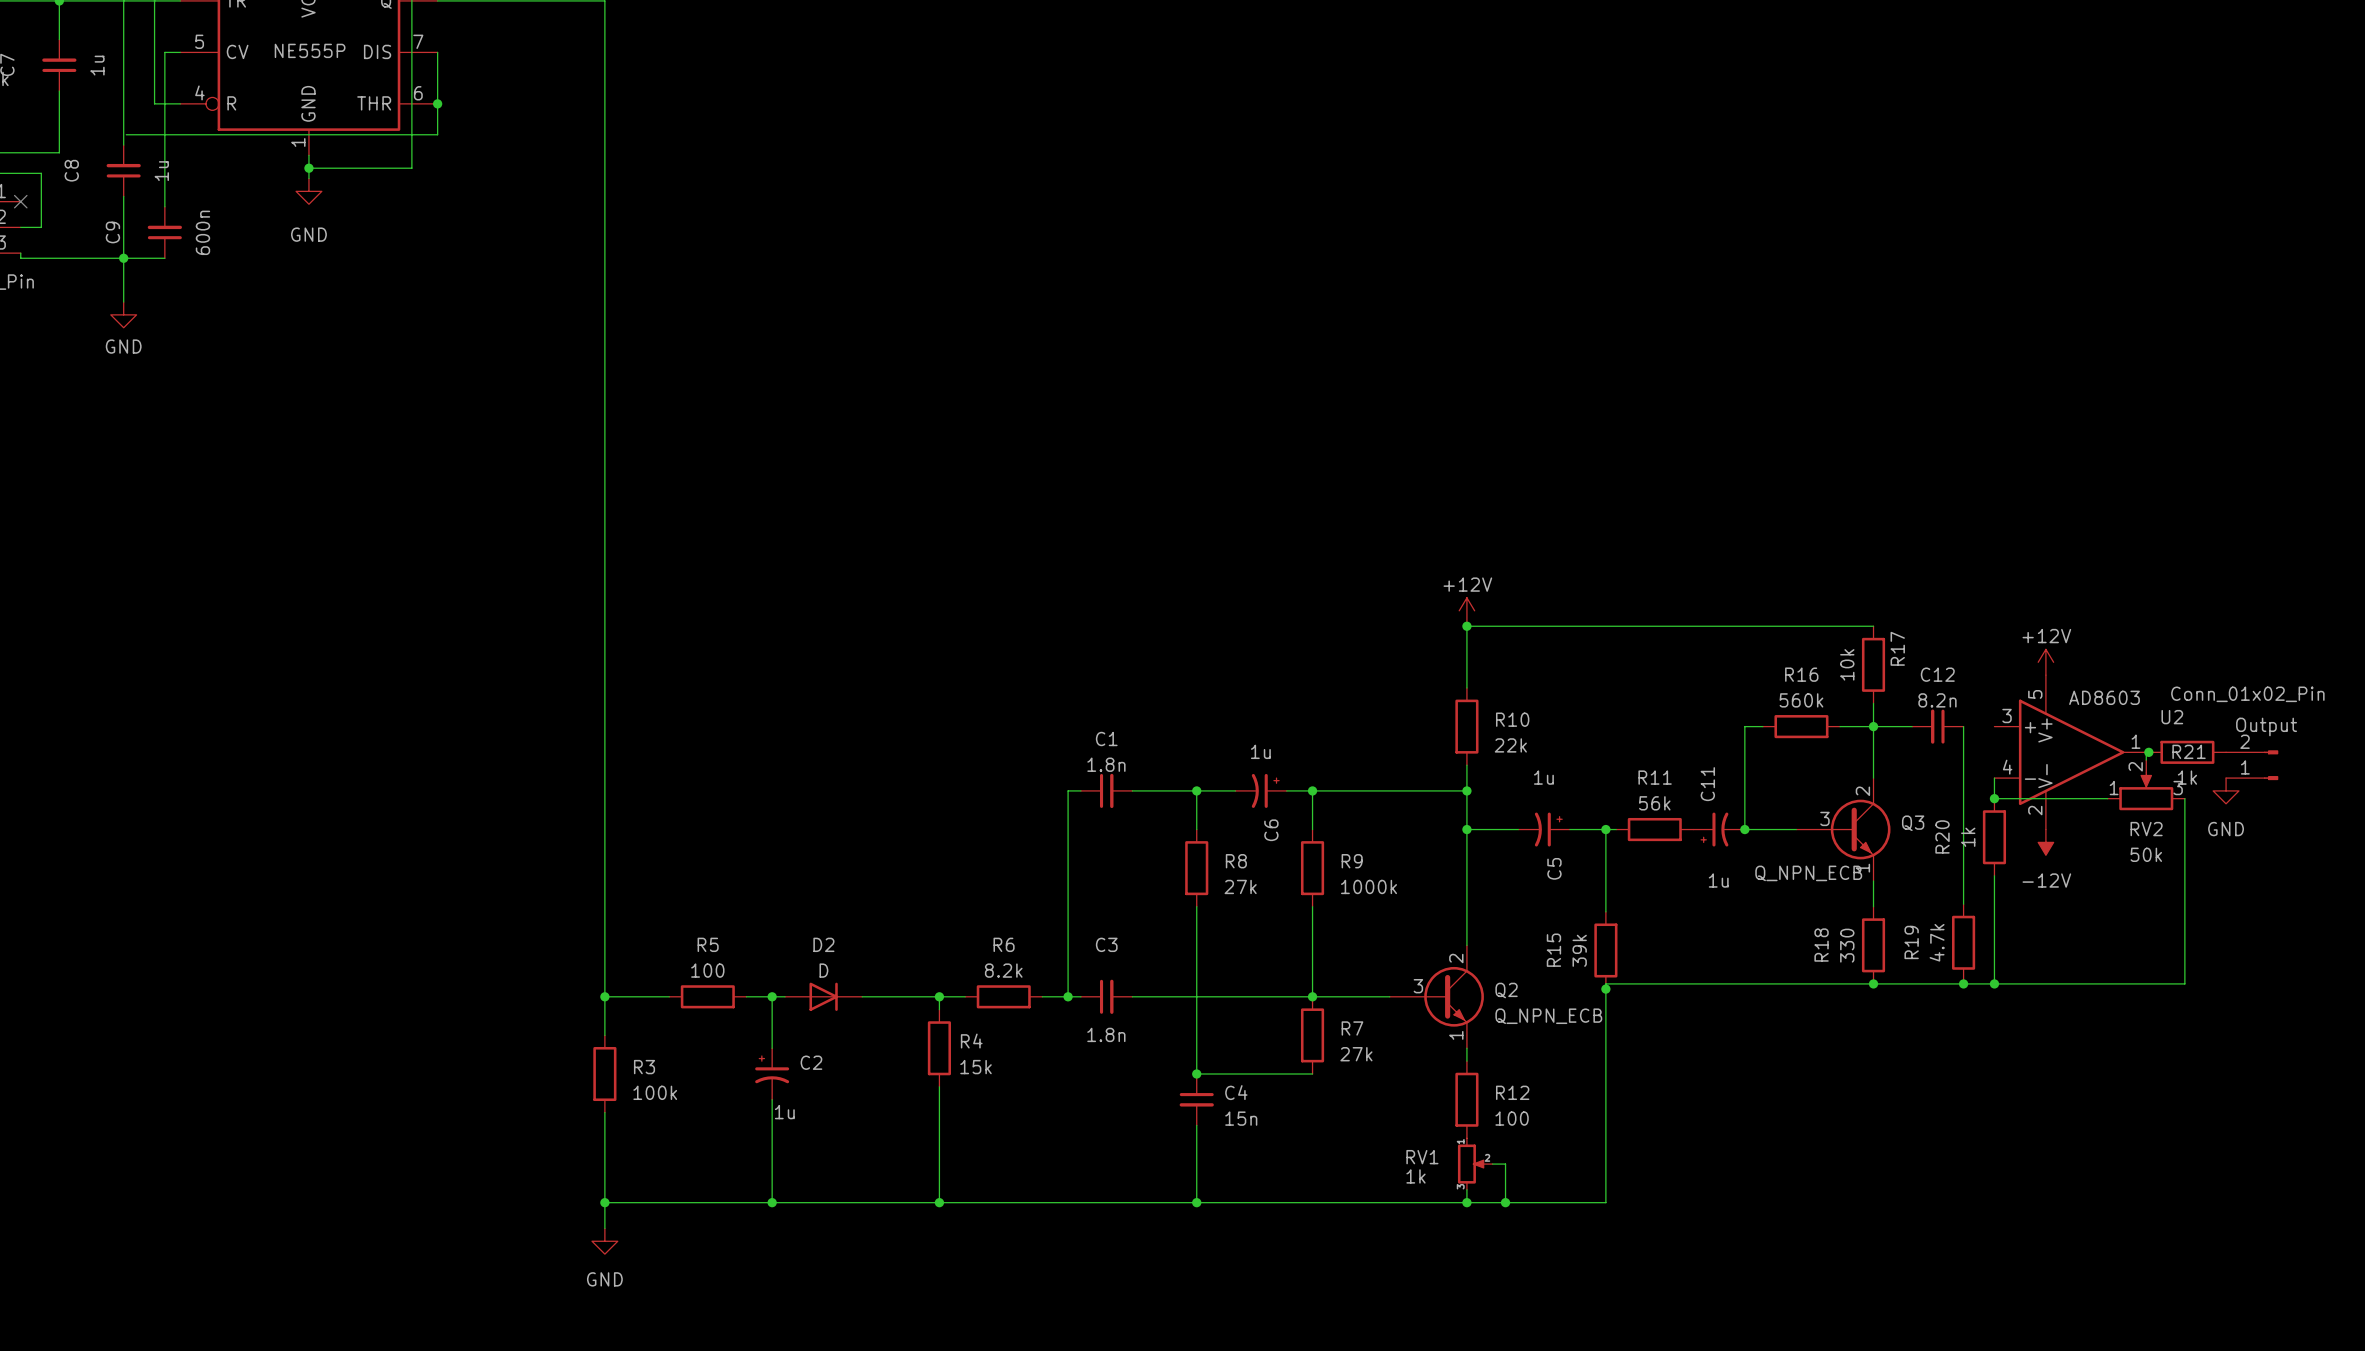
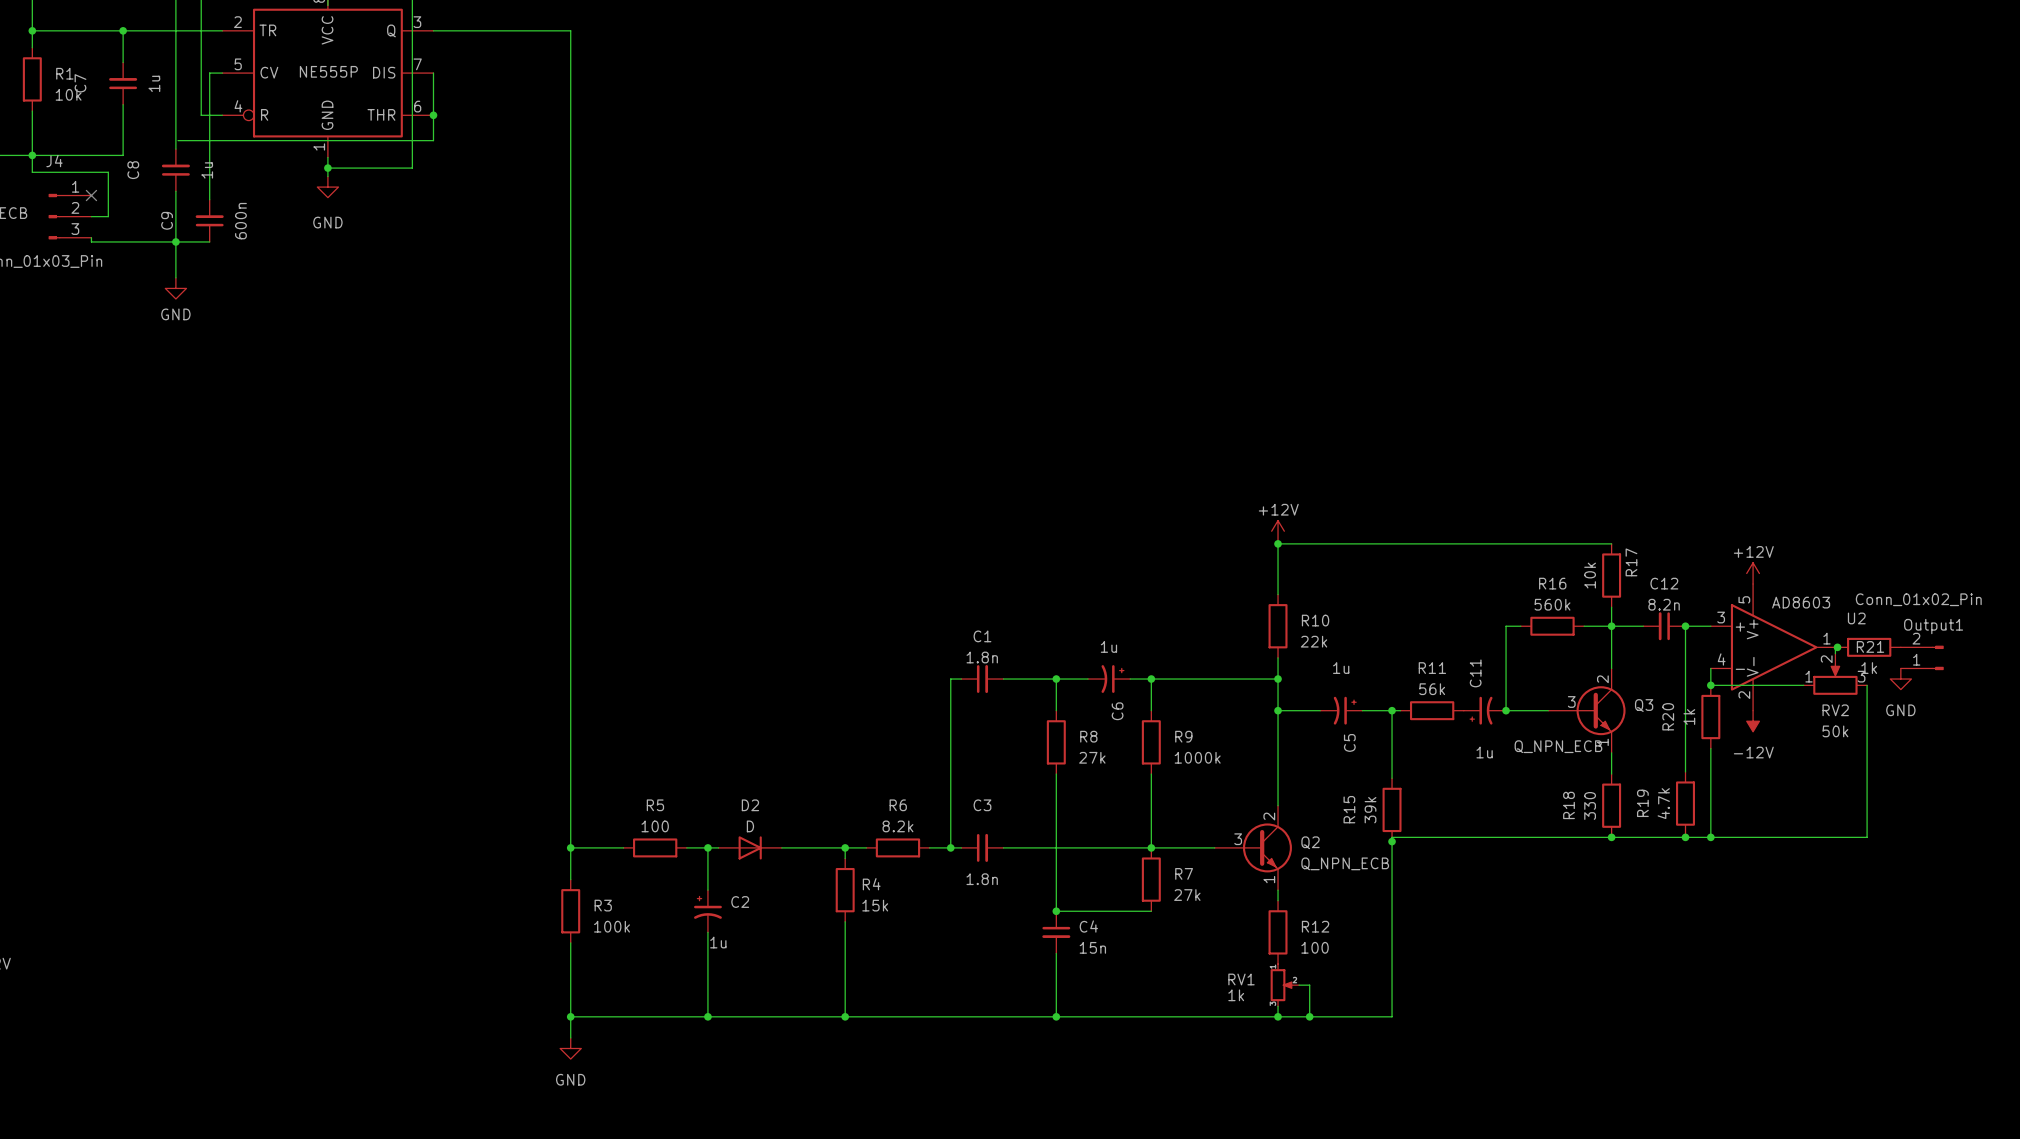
wire: none -> (1685, 626) (1710, 626)
junction: none -> (1685, 626)
Output name: Output (2266, 726) -> Output1 (1933, 626)

